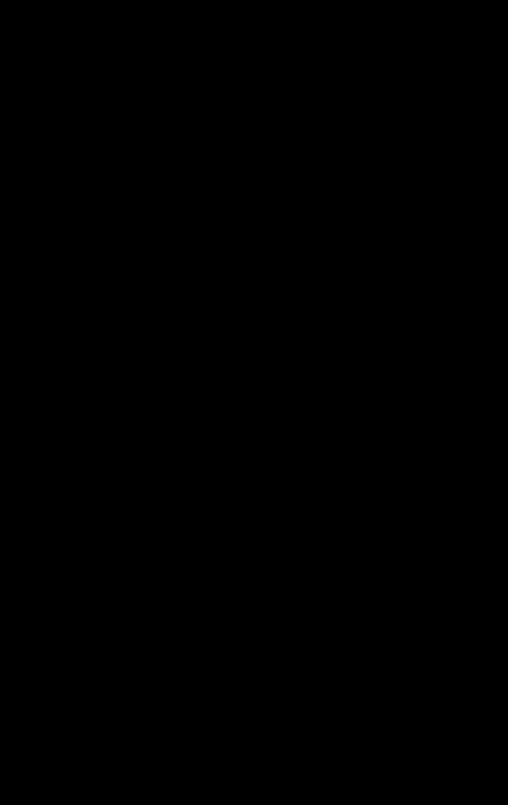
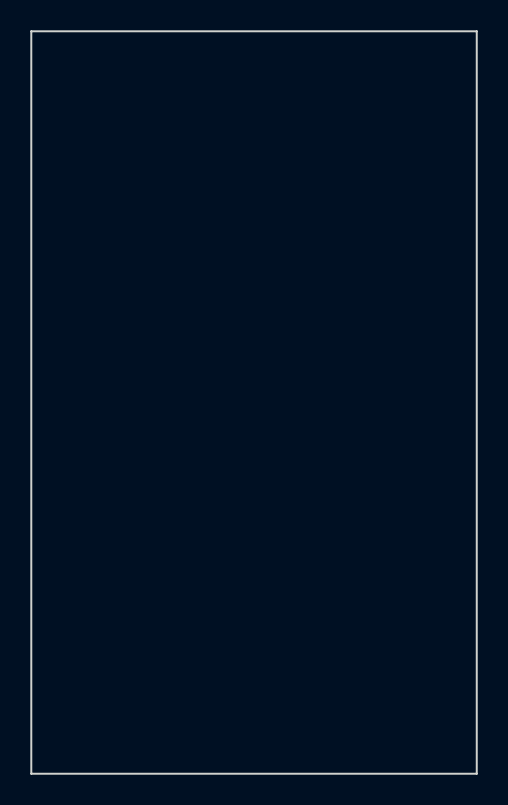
board edge: none -> (31, 31) (31, 773) (476, 773) (476, 31) (31, 31)

